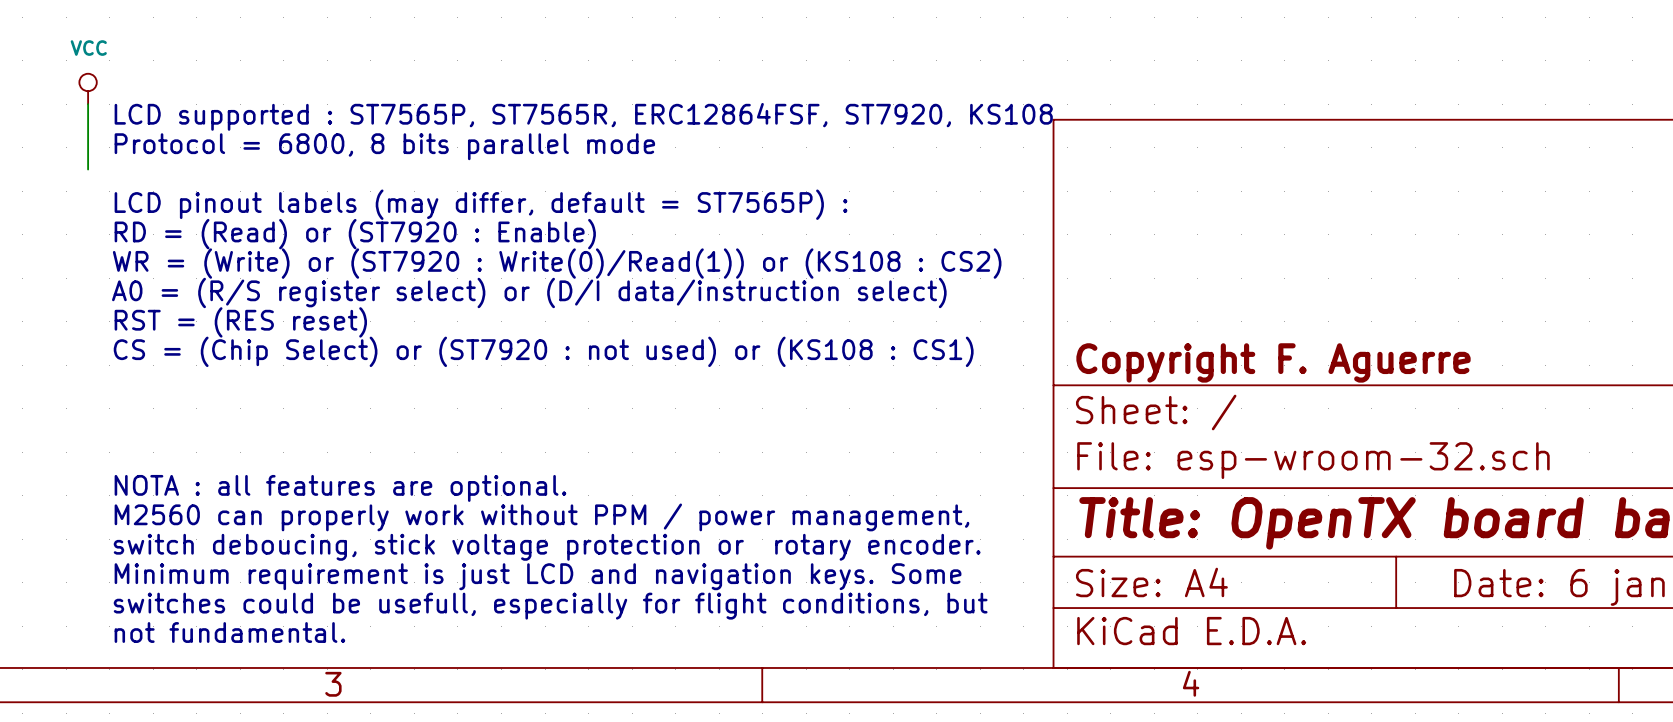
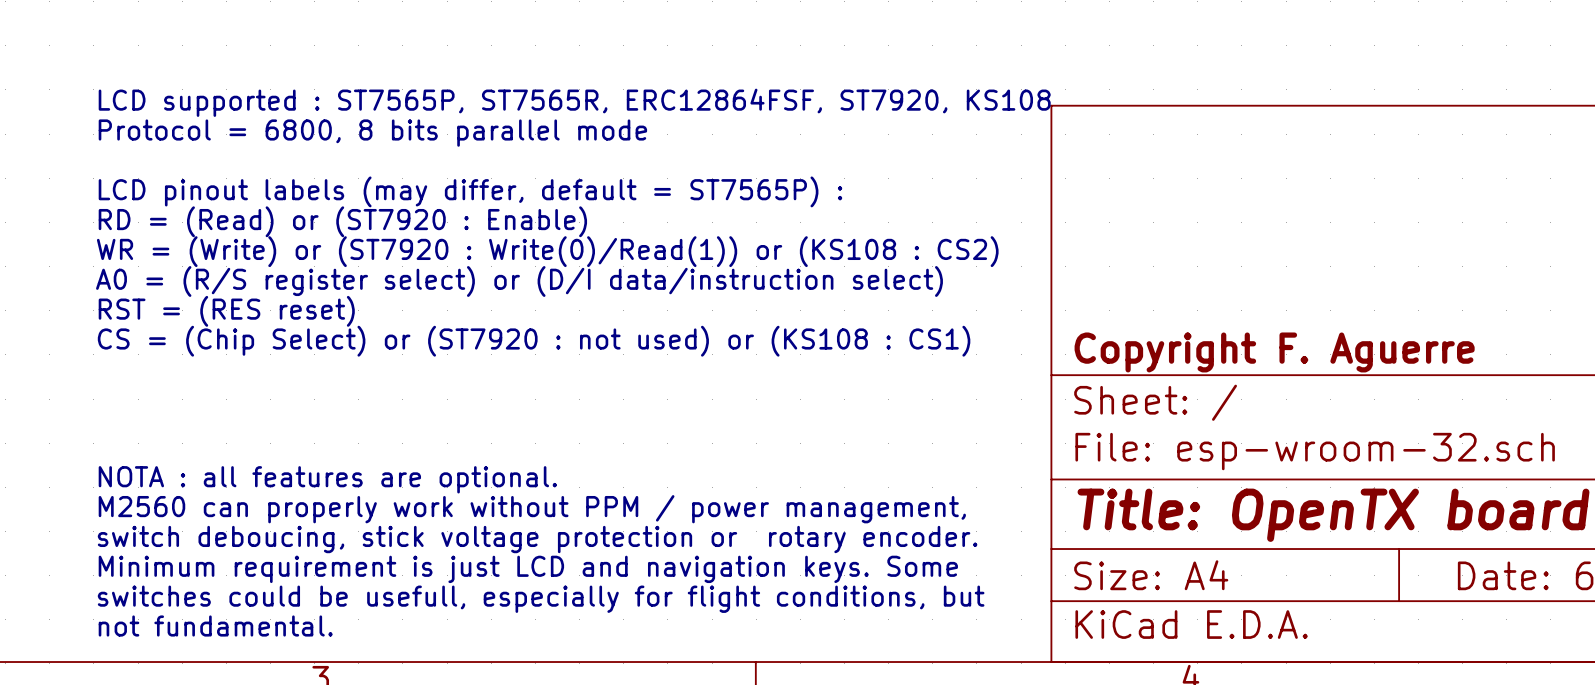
power symbol: VCC (88, 88) -> none
wire: (88, 104) (88, 169) -> none

